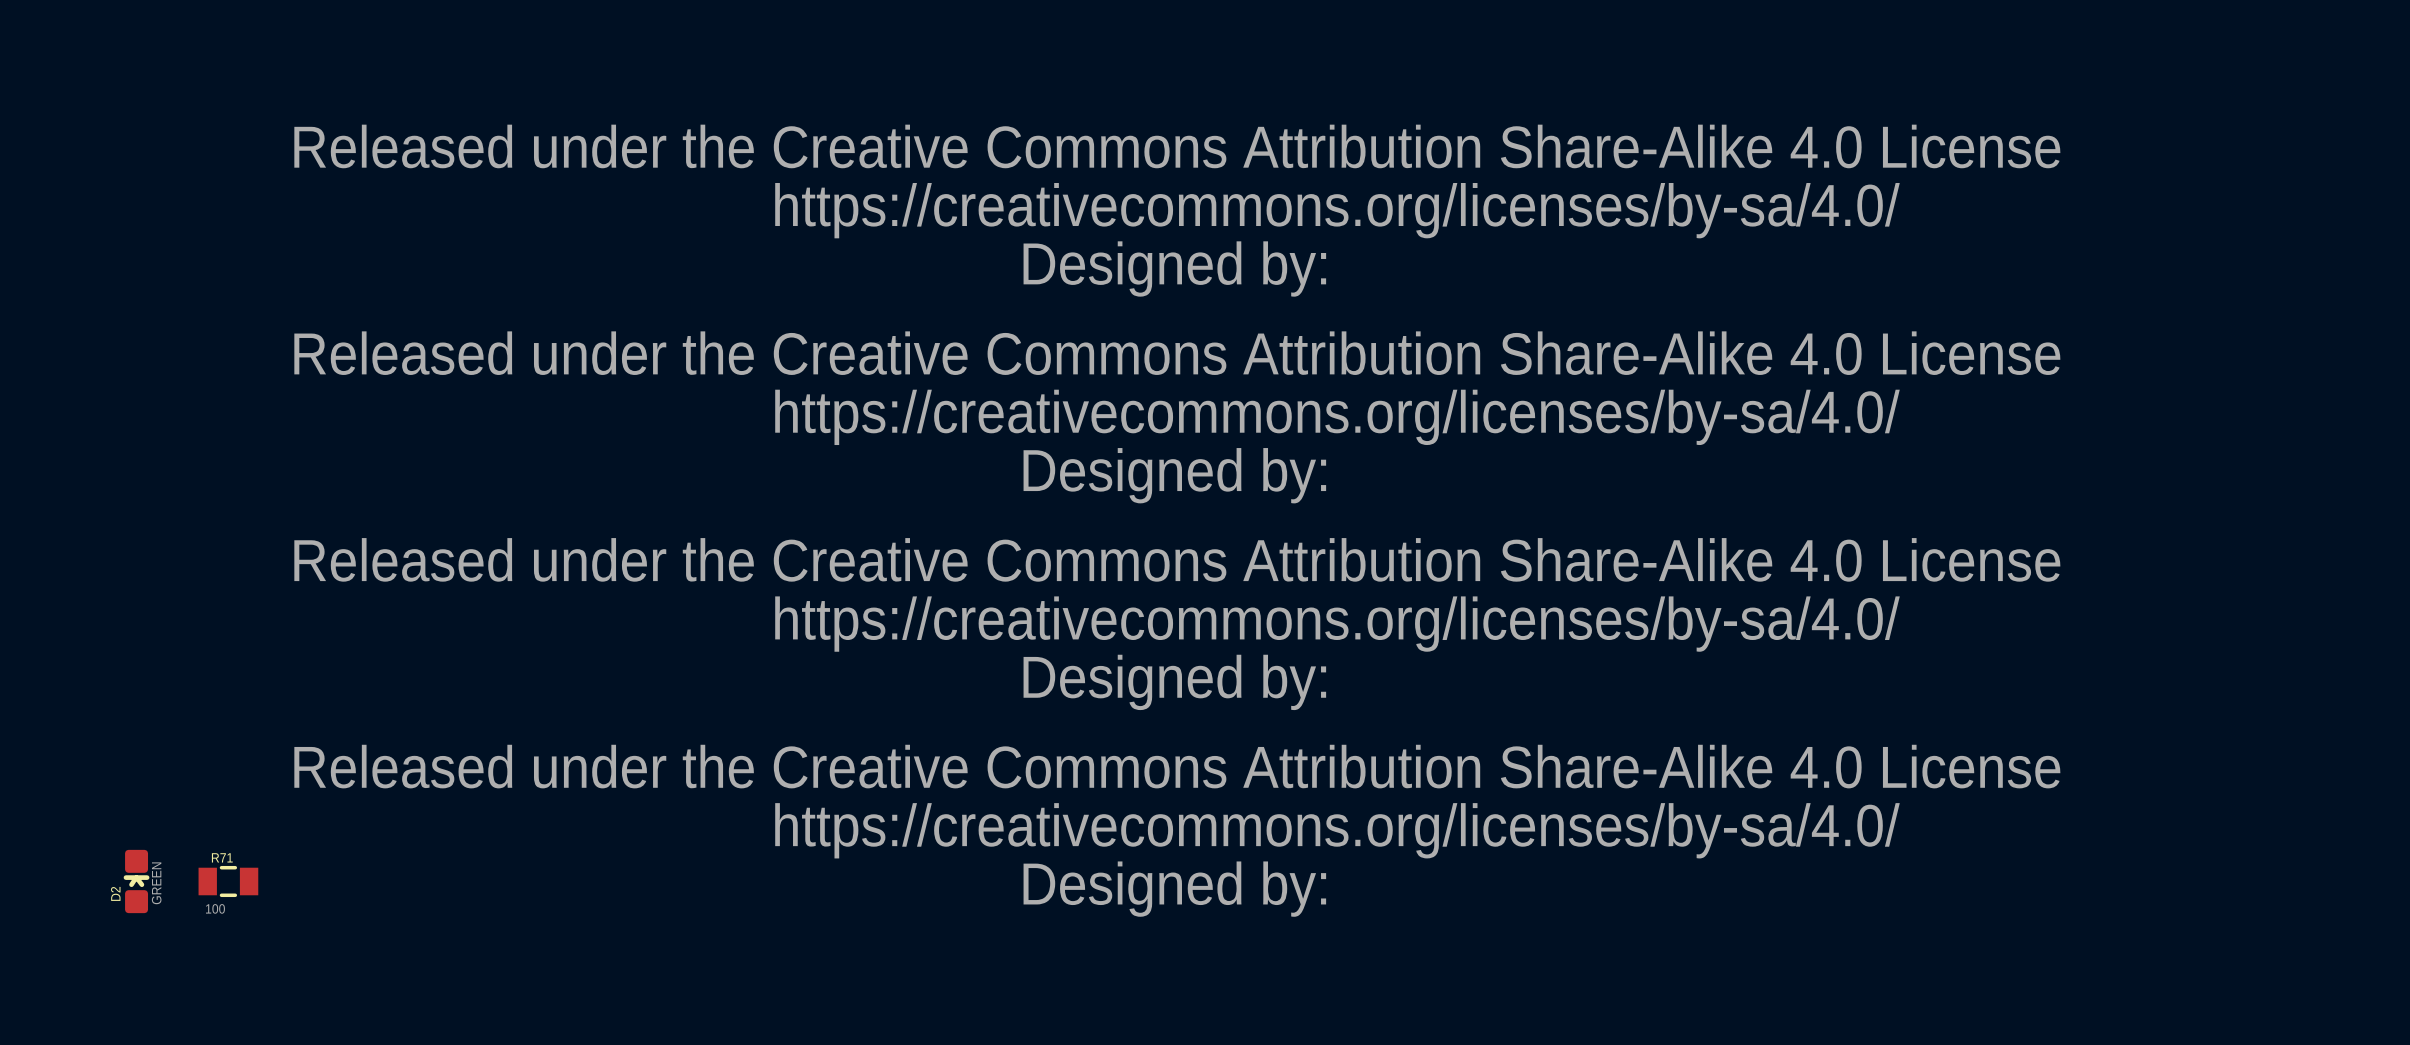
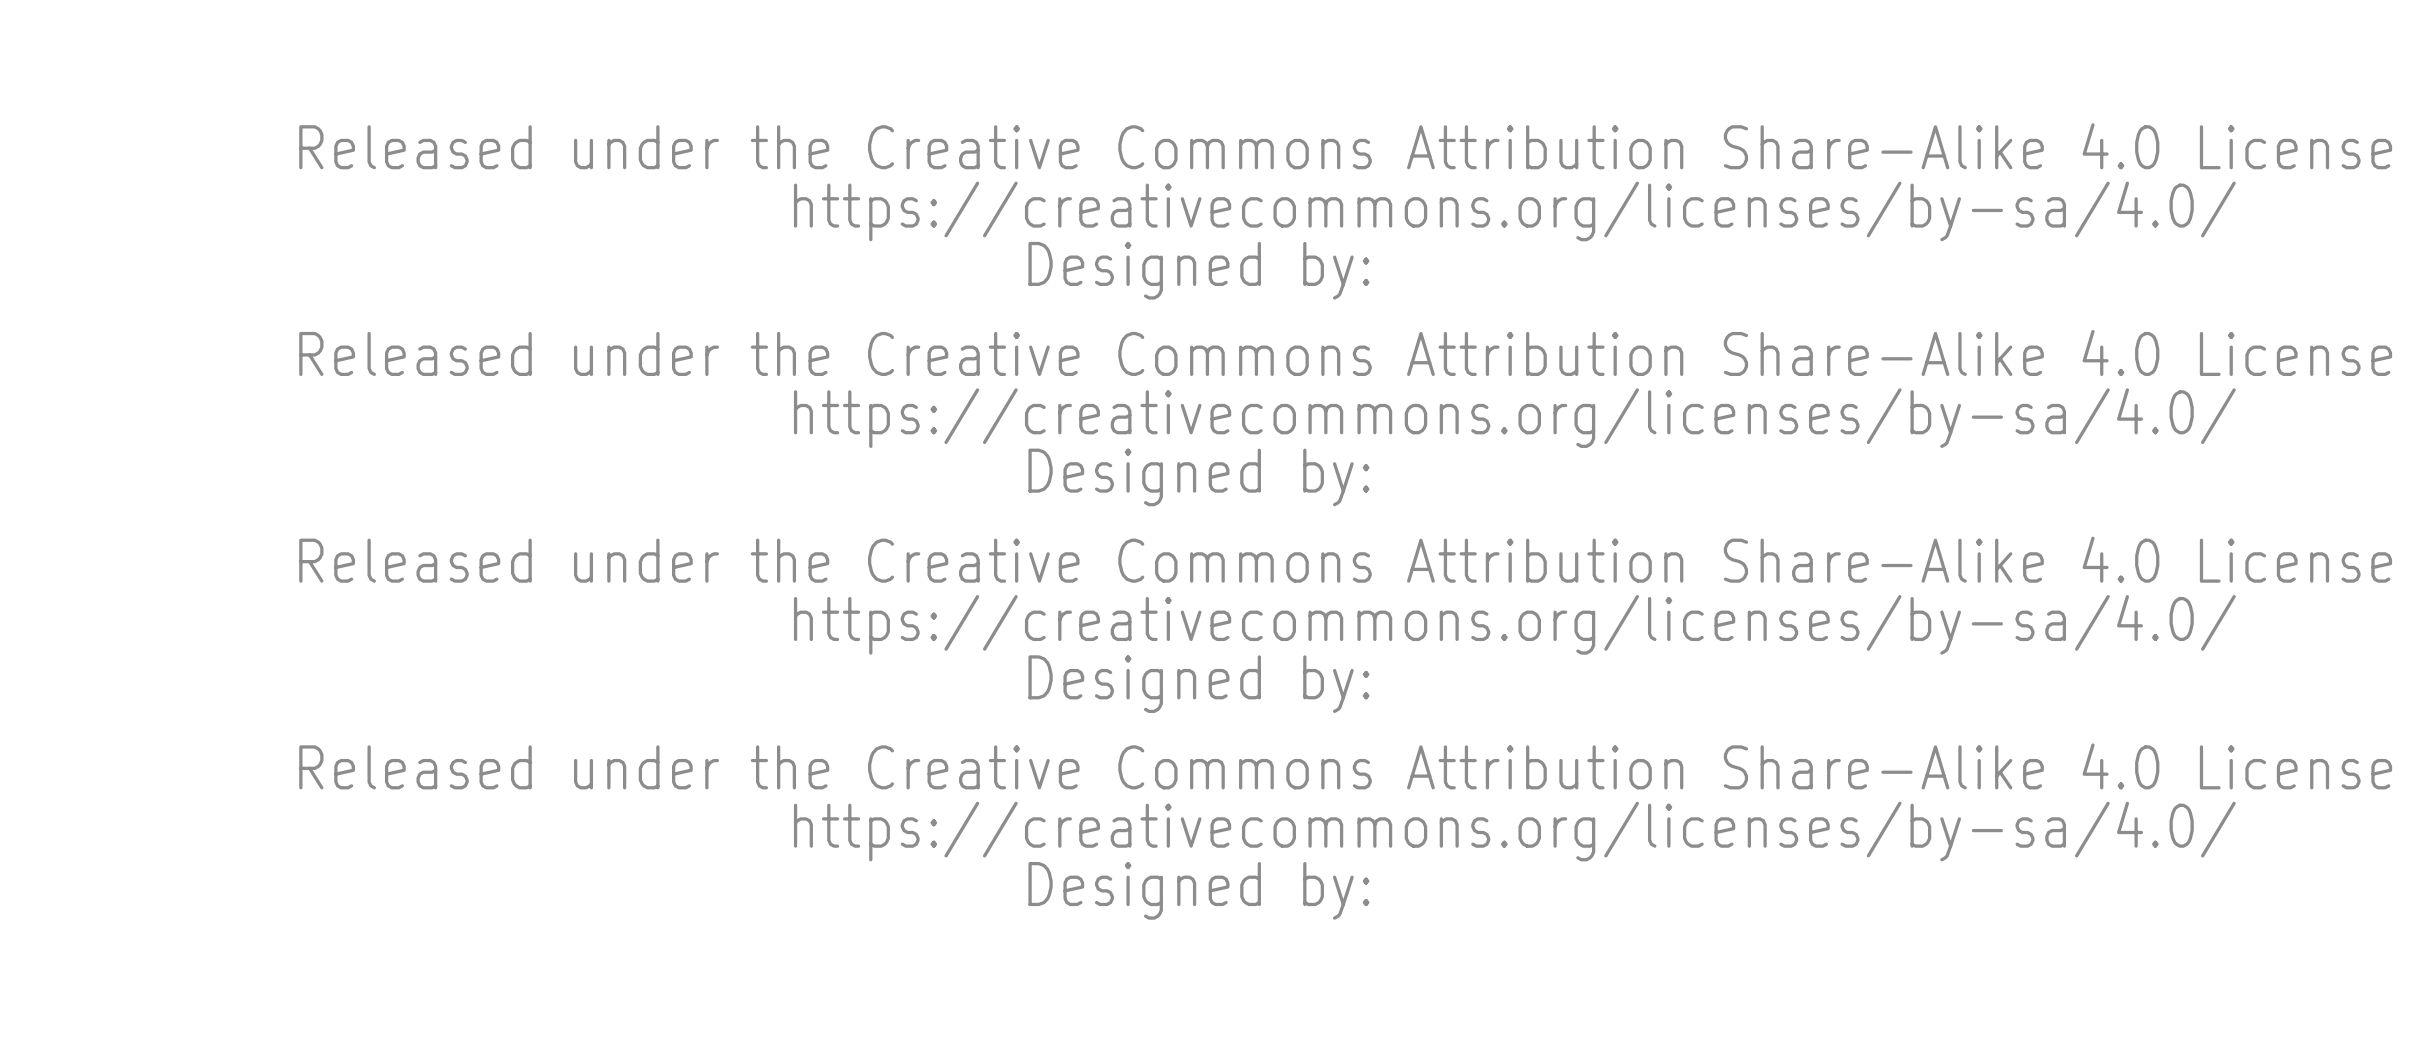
D2: GREEN (136, 881) -> none
R71: 100 (228, 881) -> none

